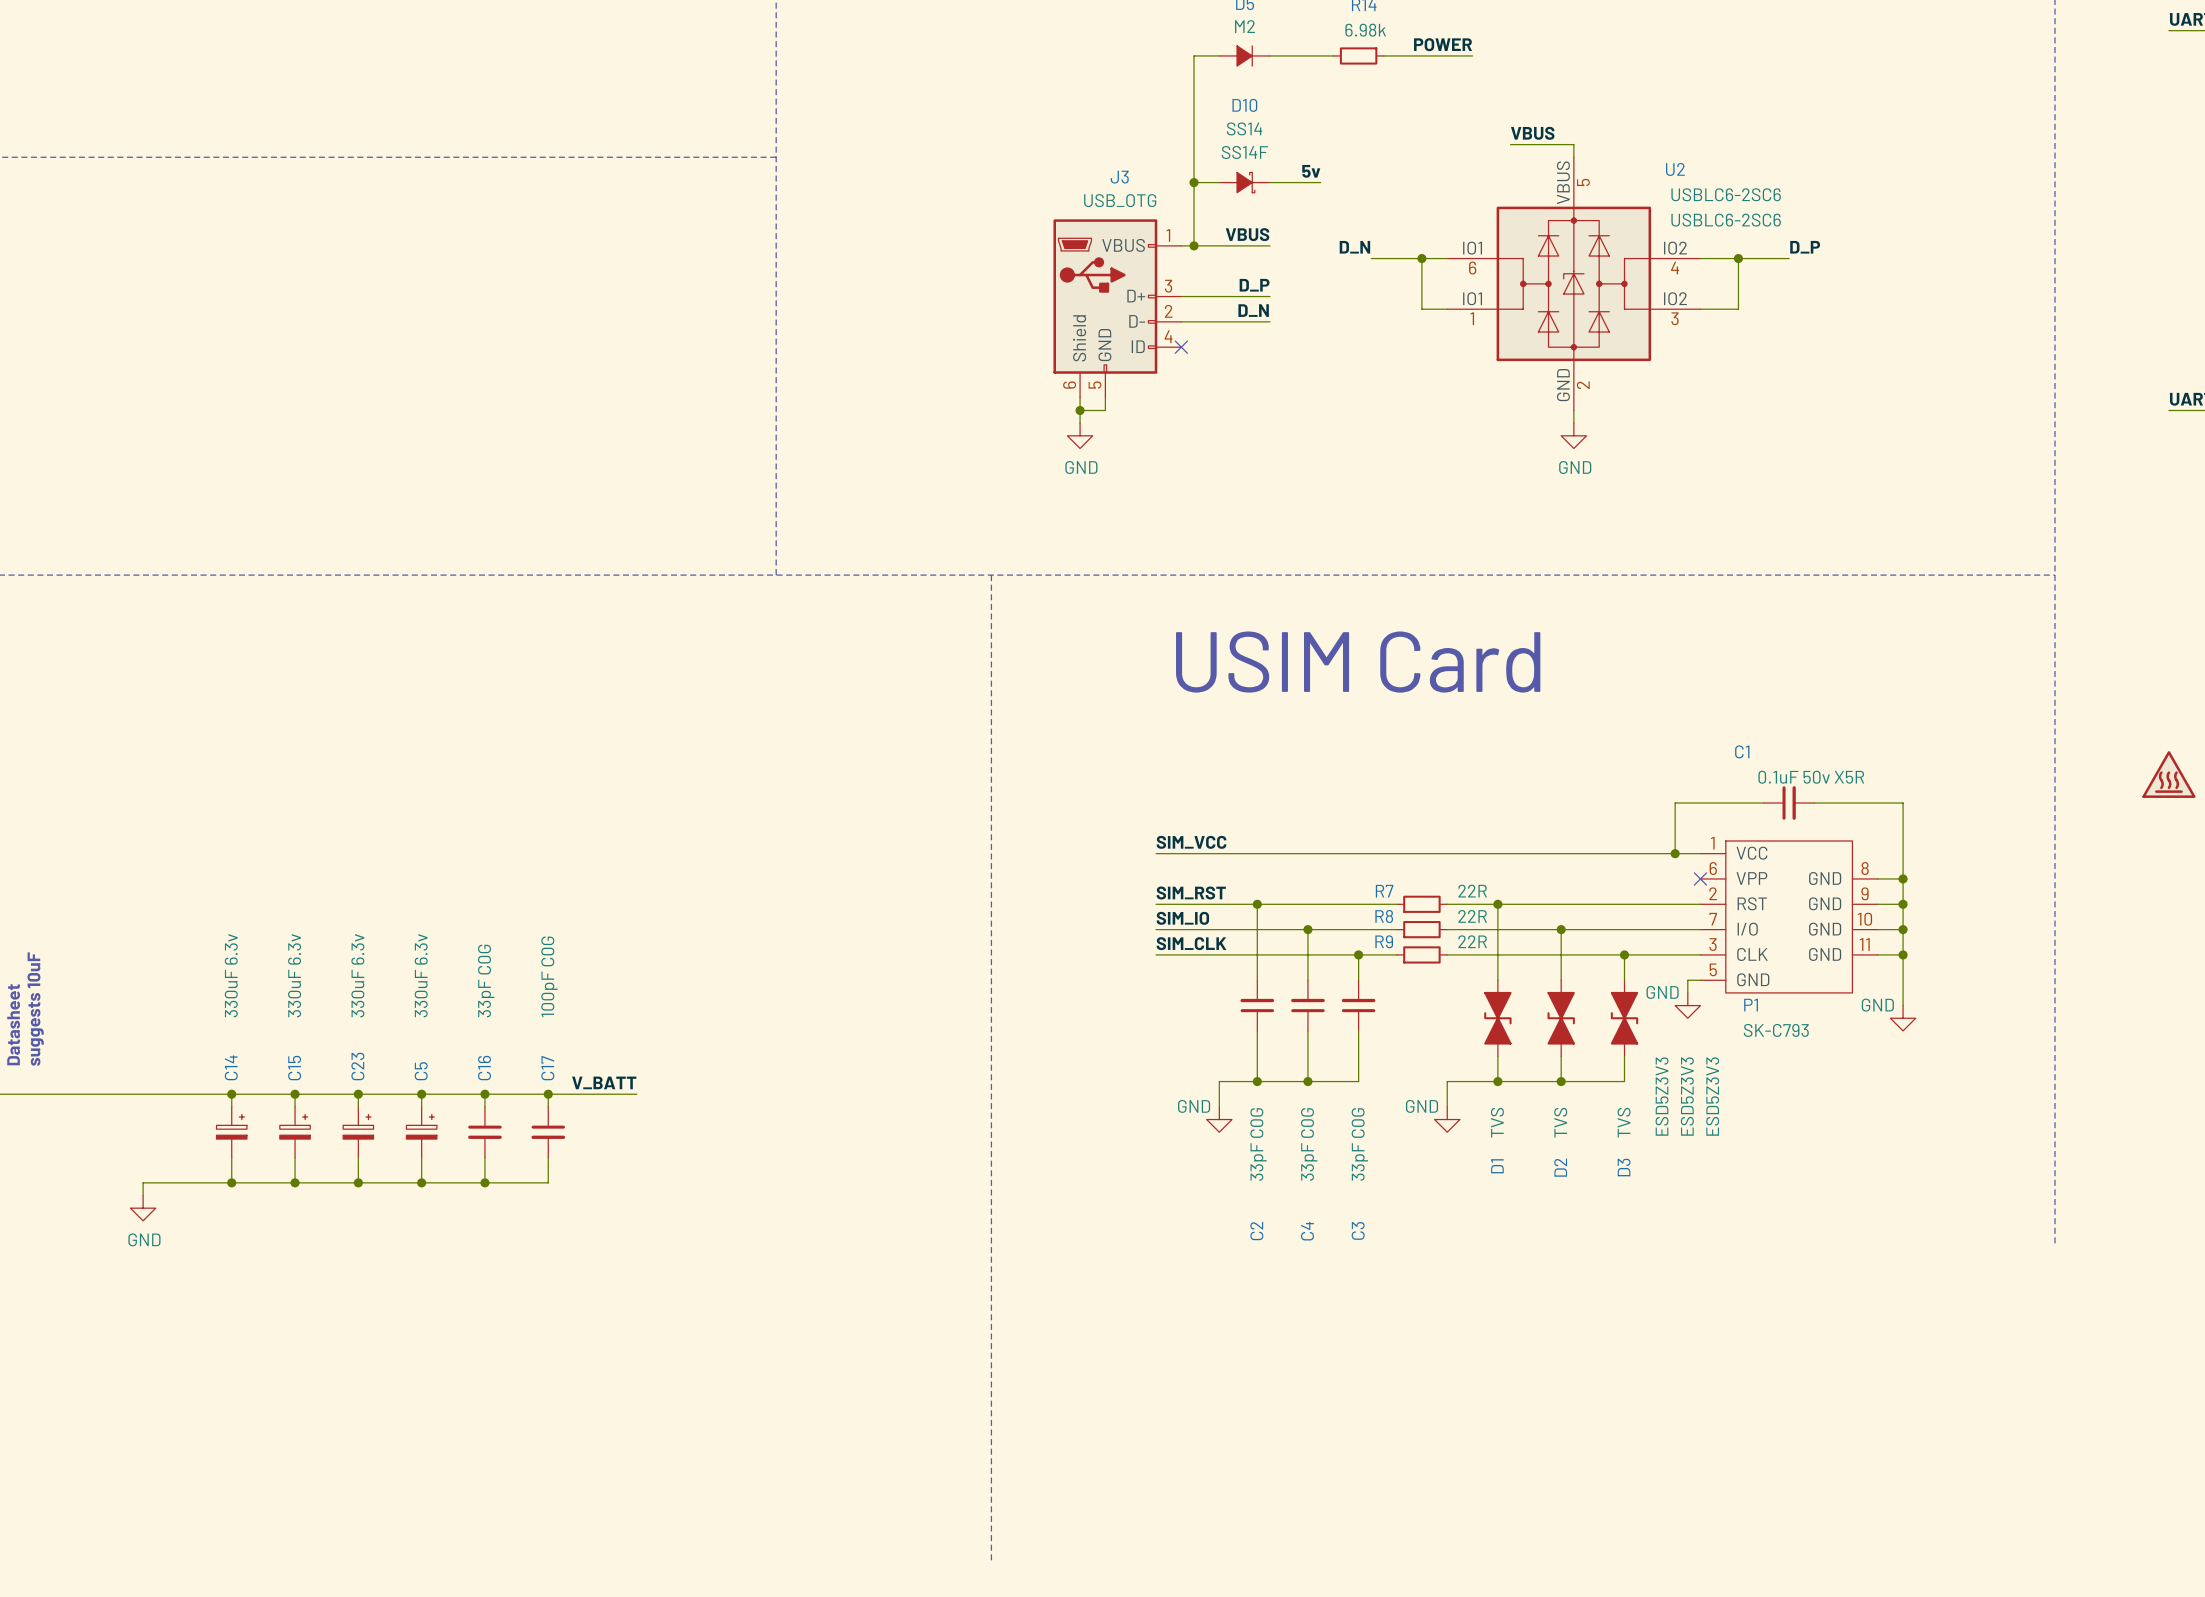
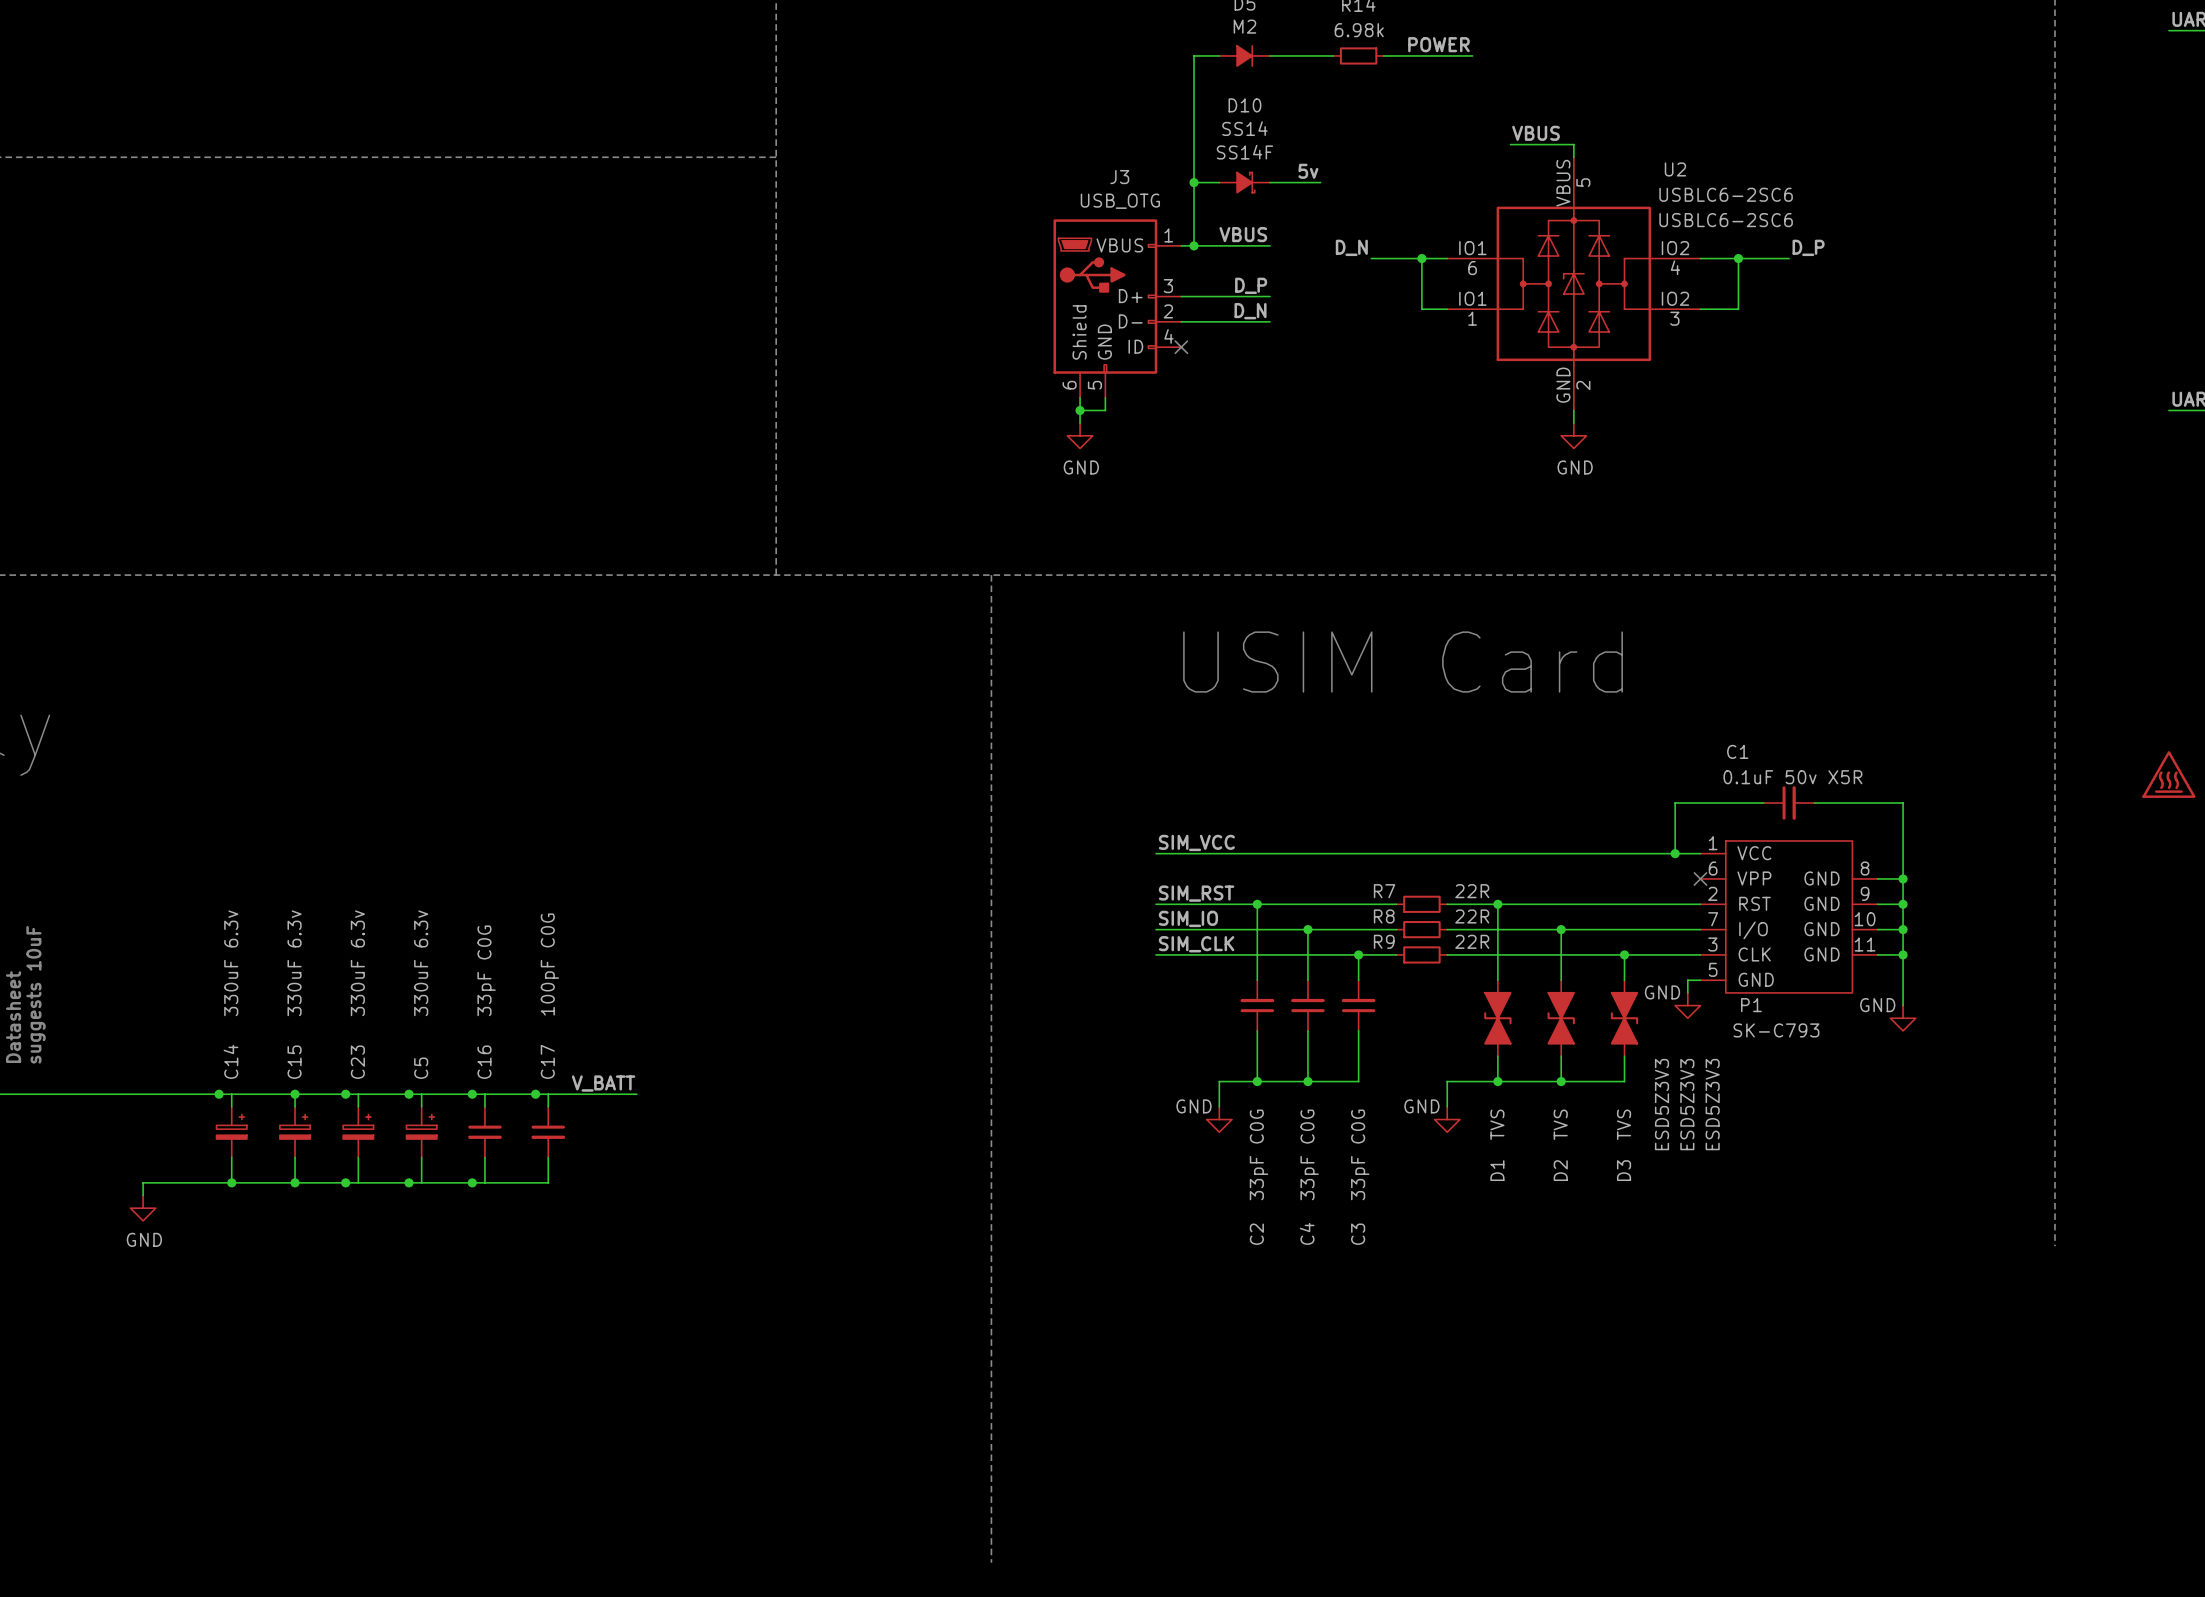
junction position: (231, 1094) -> (219, 1094)
junction position: (358, 1094) -> (345, 1094)
junction position: (421, 1094) -> (408, 1094)
junction position: (484, 1094) -> (472, 1094)
junction position: (548, 1094) -> (535, 1094)
junction position: (358, 1182) -> (345, 1182)
junction position: (421, 1182) -> (408, 1182)
junction position: (484, 1182) -> (472, 1182)

